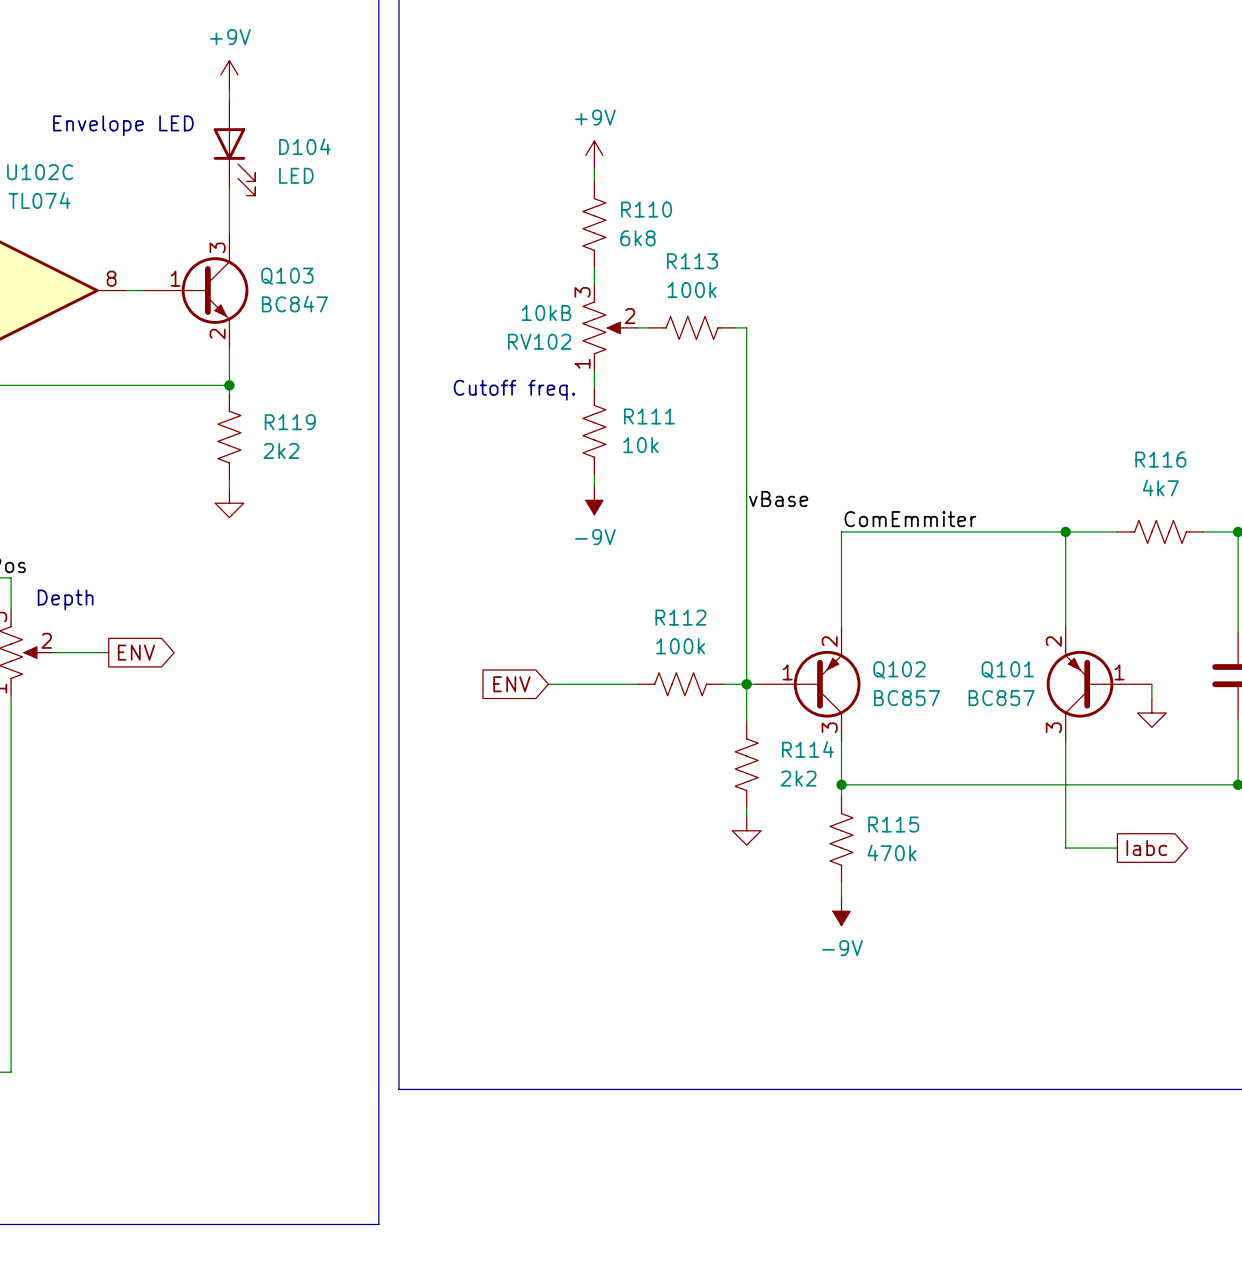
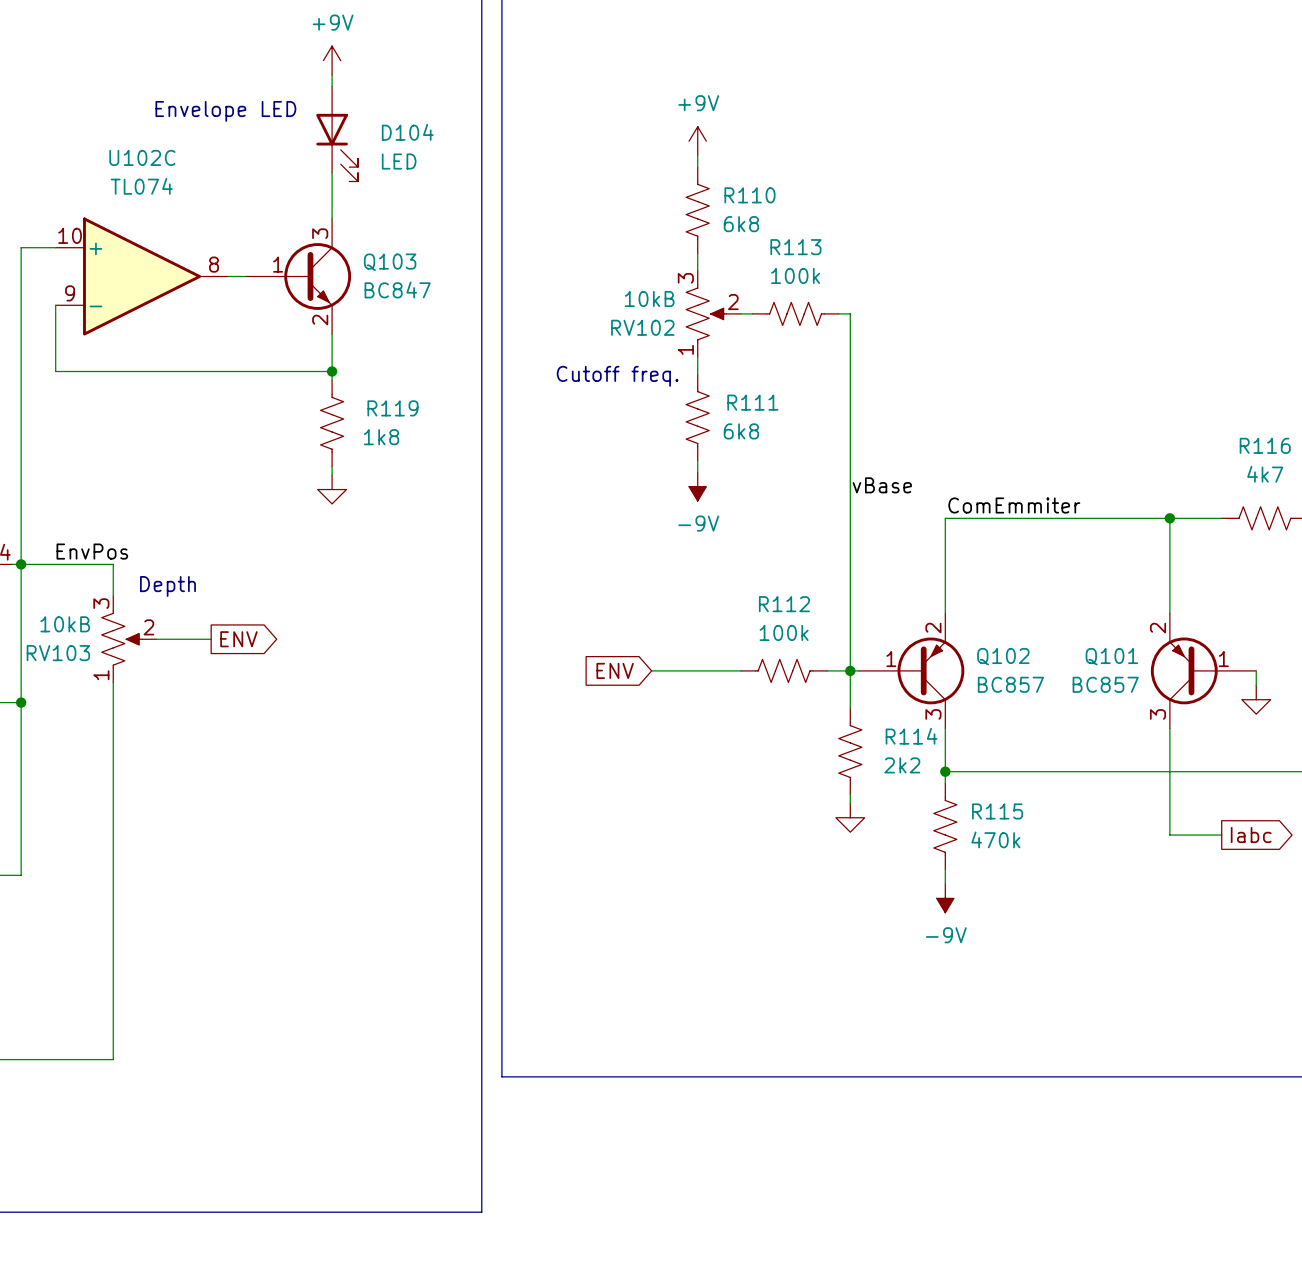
R111 value: 10k (640, 445) -> 6k8 (741, 431)
R119 value: 2k2 (281, 450) -> 1k8 (381, 437)

